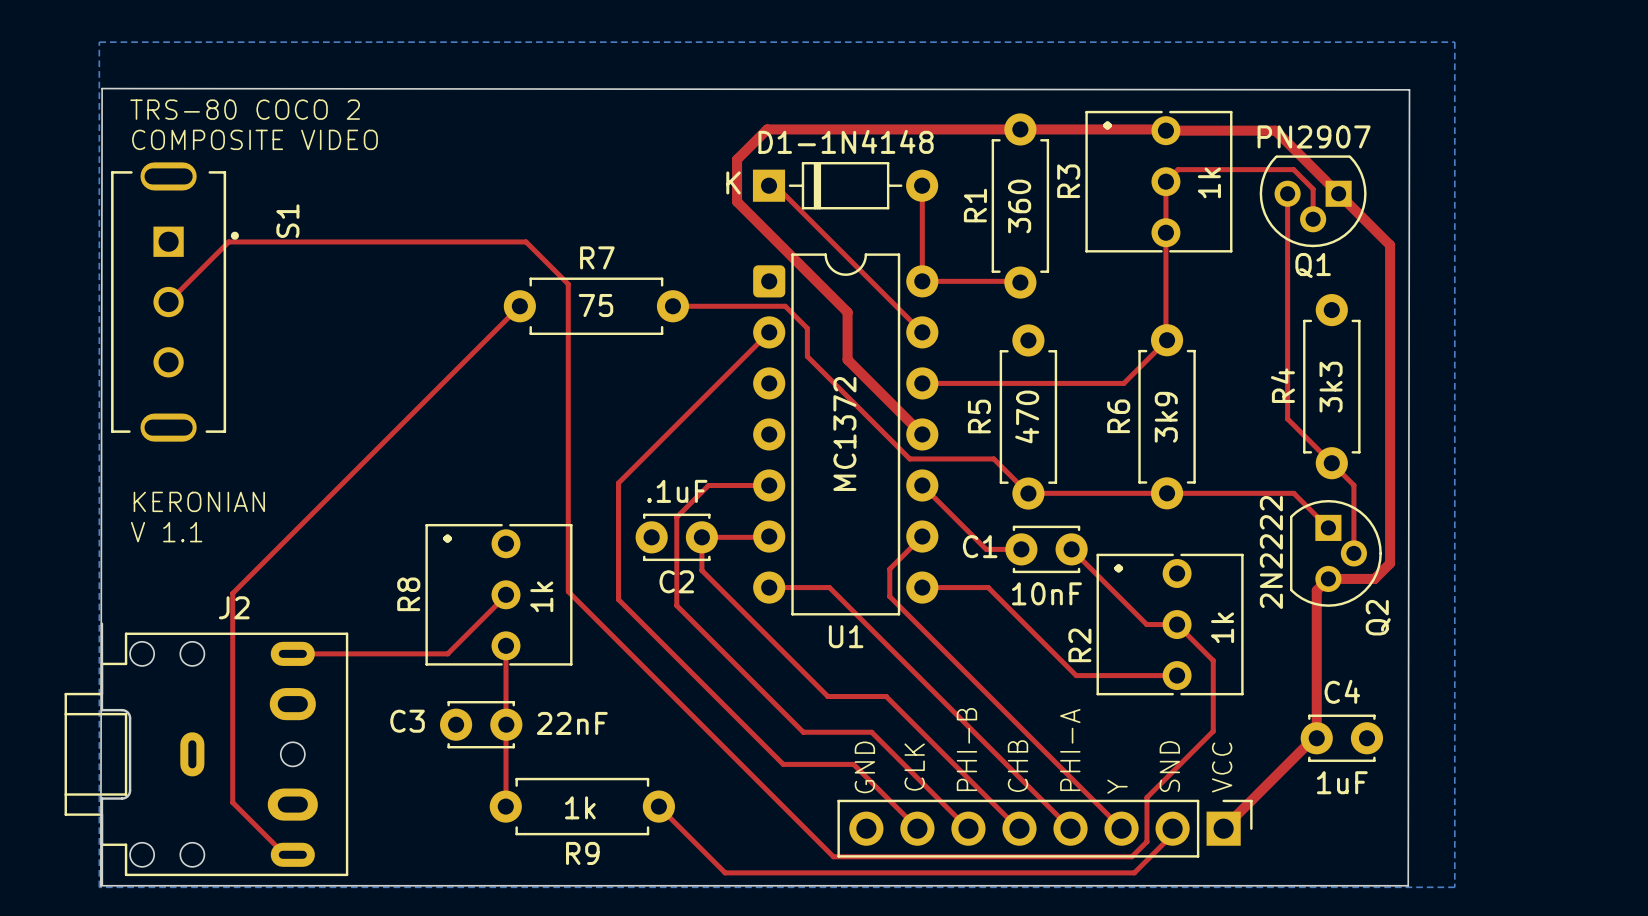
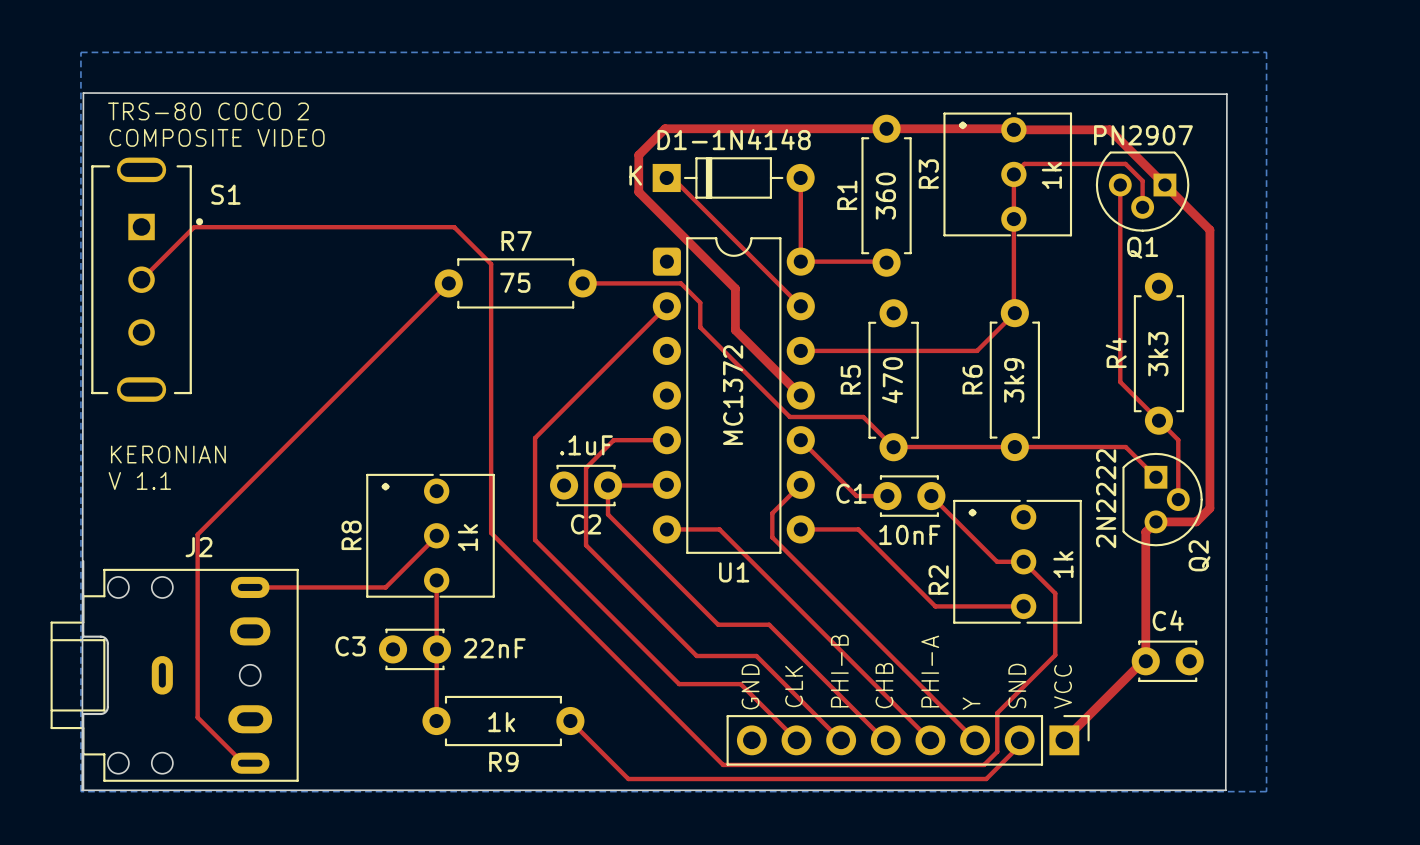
S1 name rotation: 0° (287, 221) -> 90° clockwise (225, 194)
C4 value: 1uF (1342, 782) -> none

